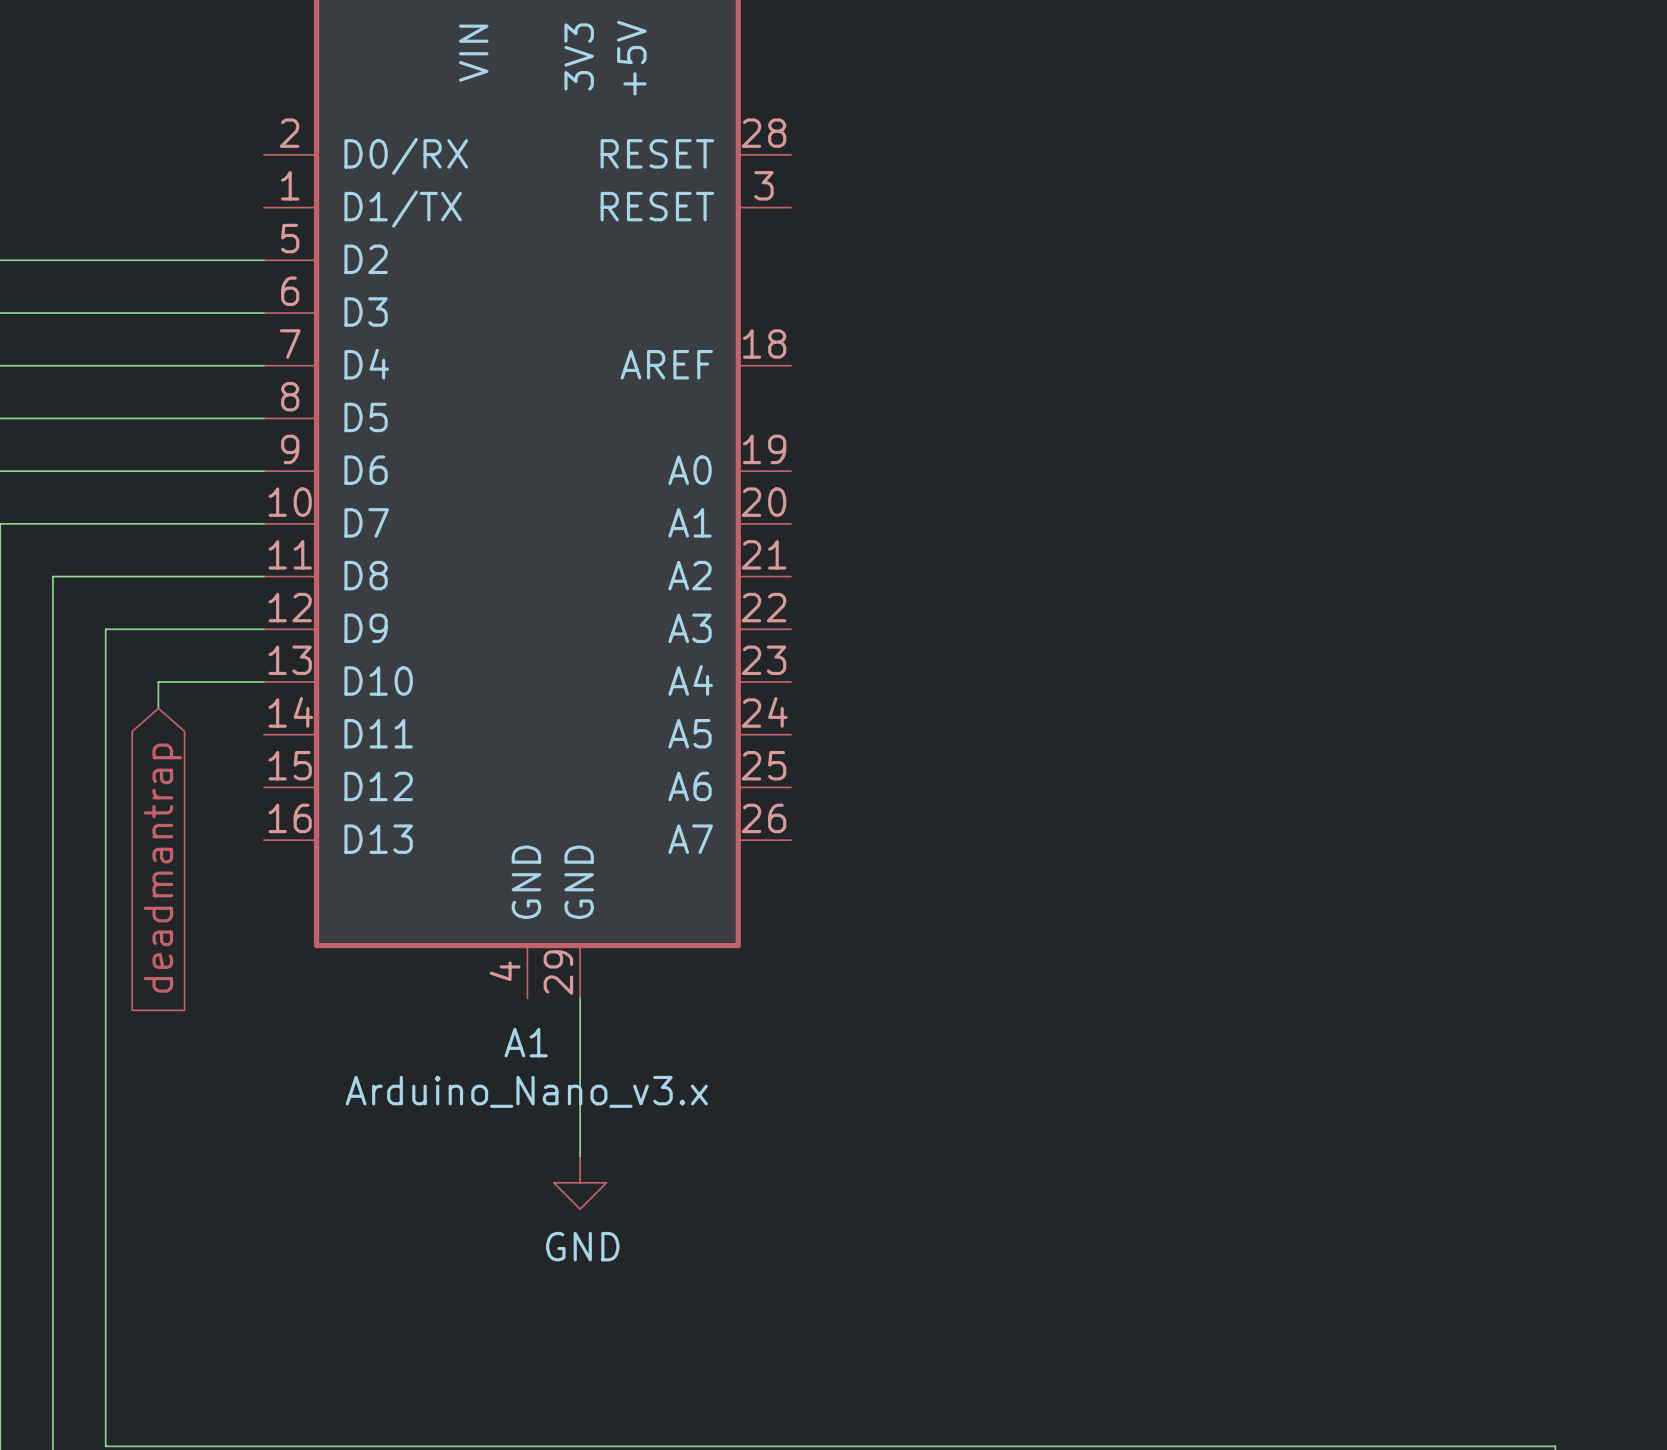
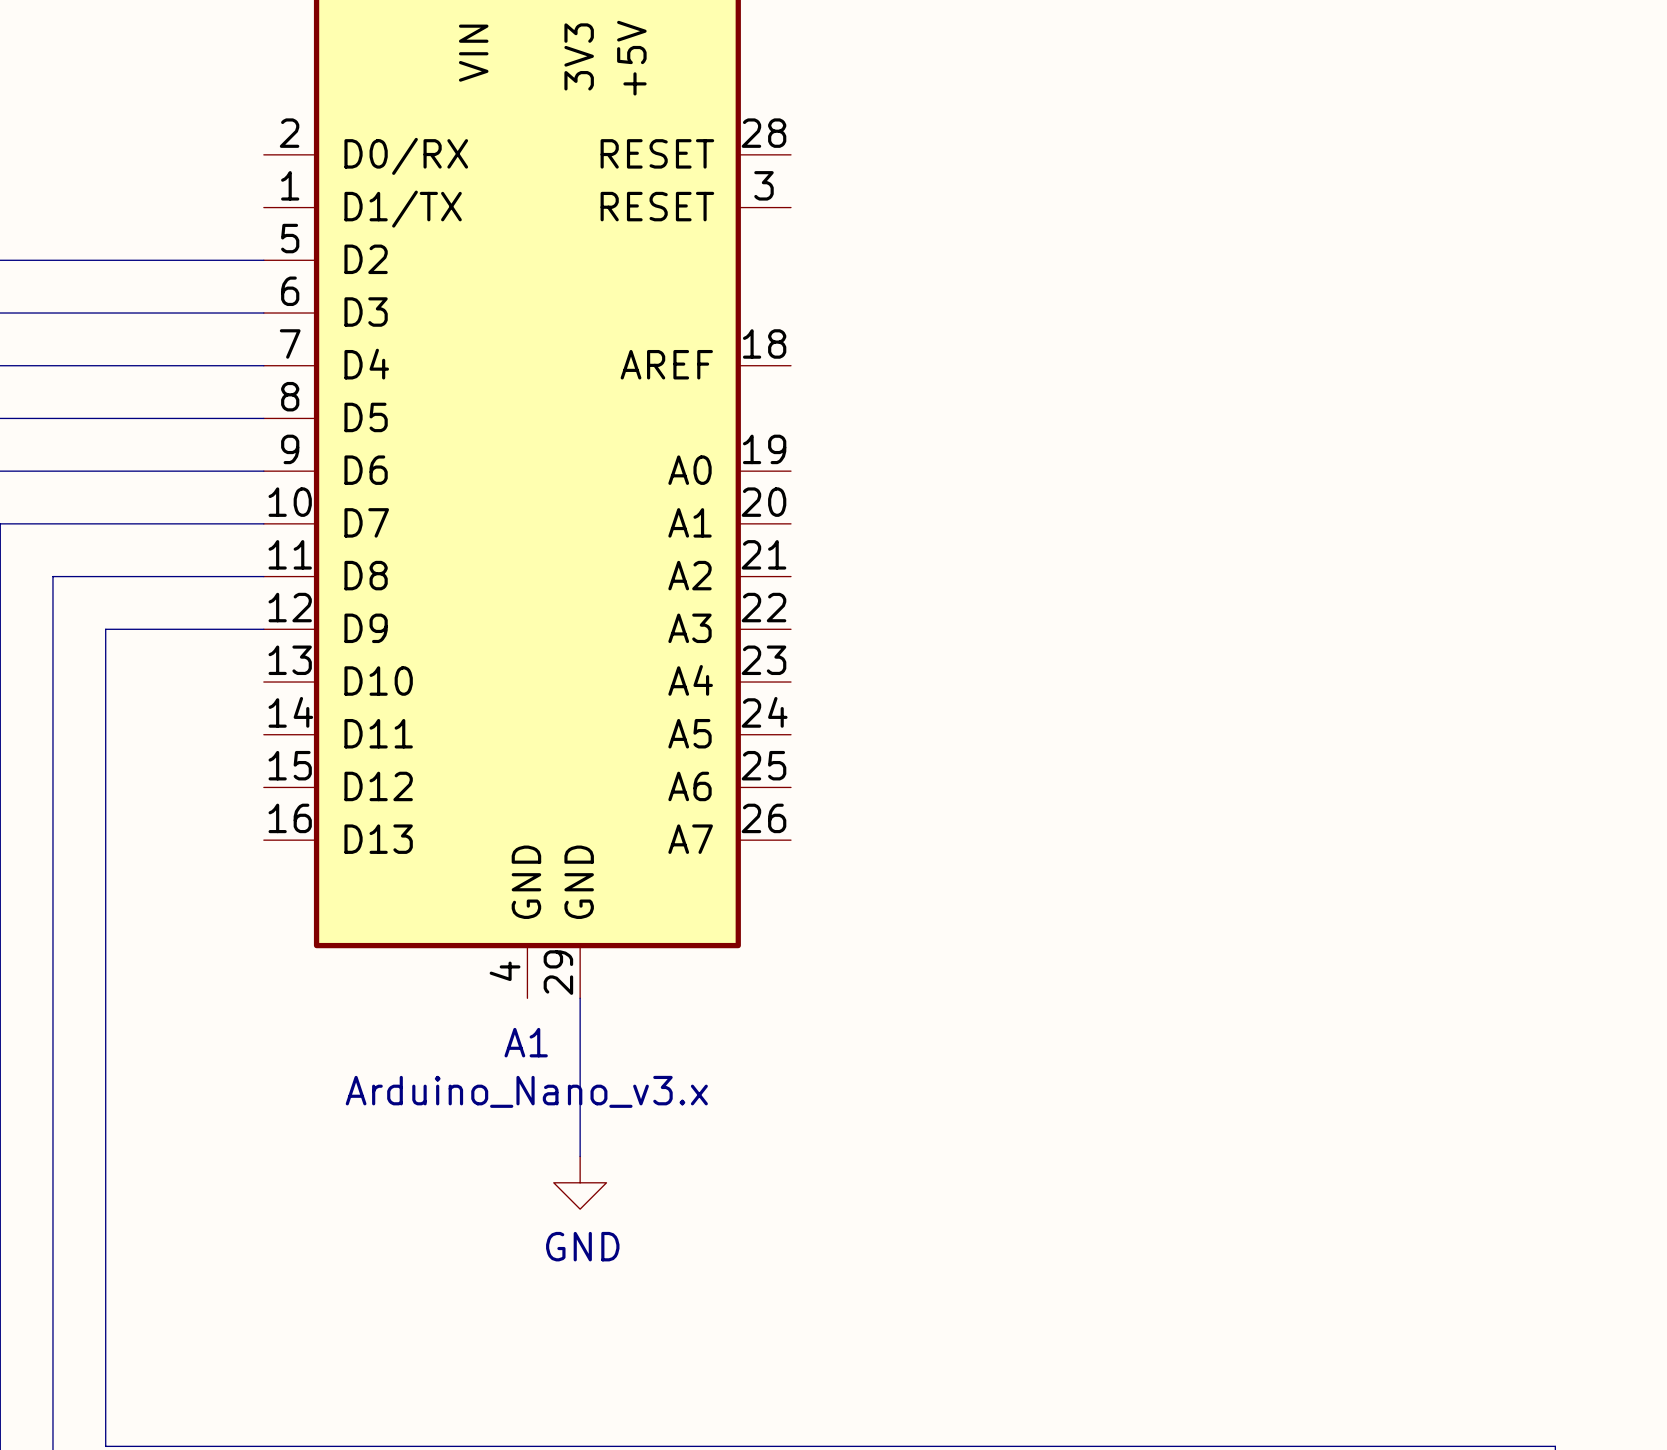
wire: (263, 682) (158, 682) (158, 708) -> none
global label: deadmantrap (162, 868) -> none

